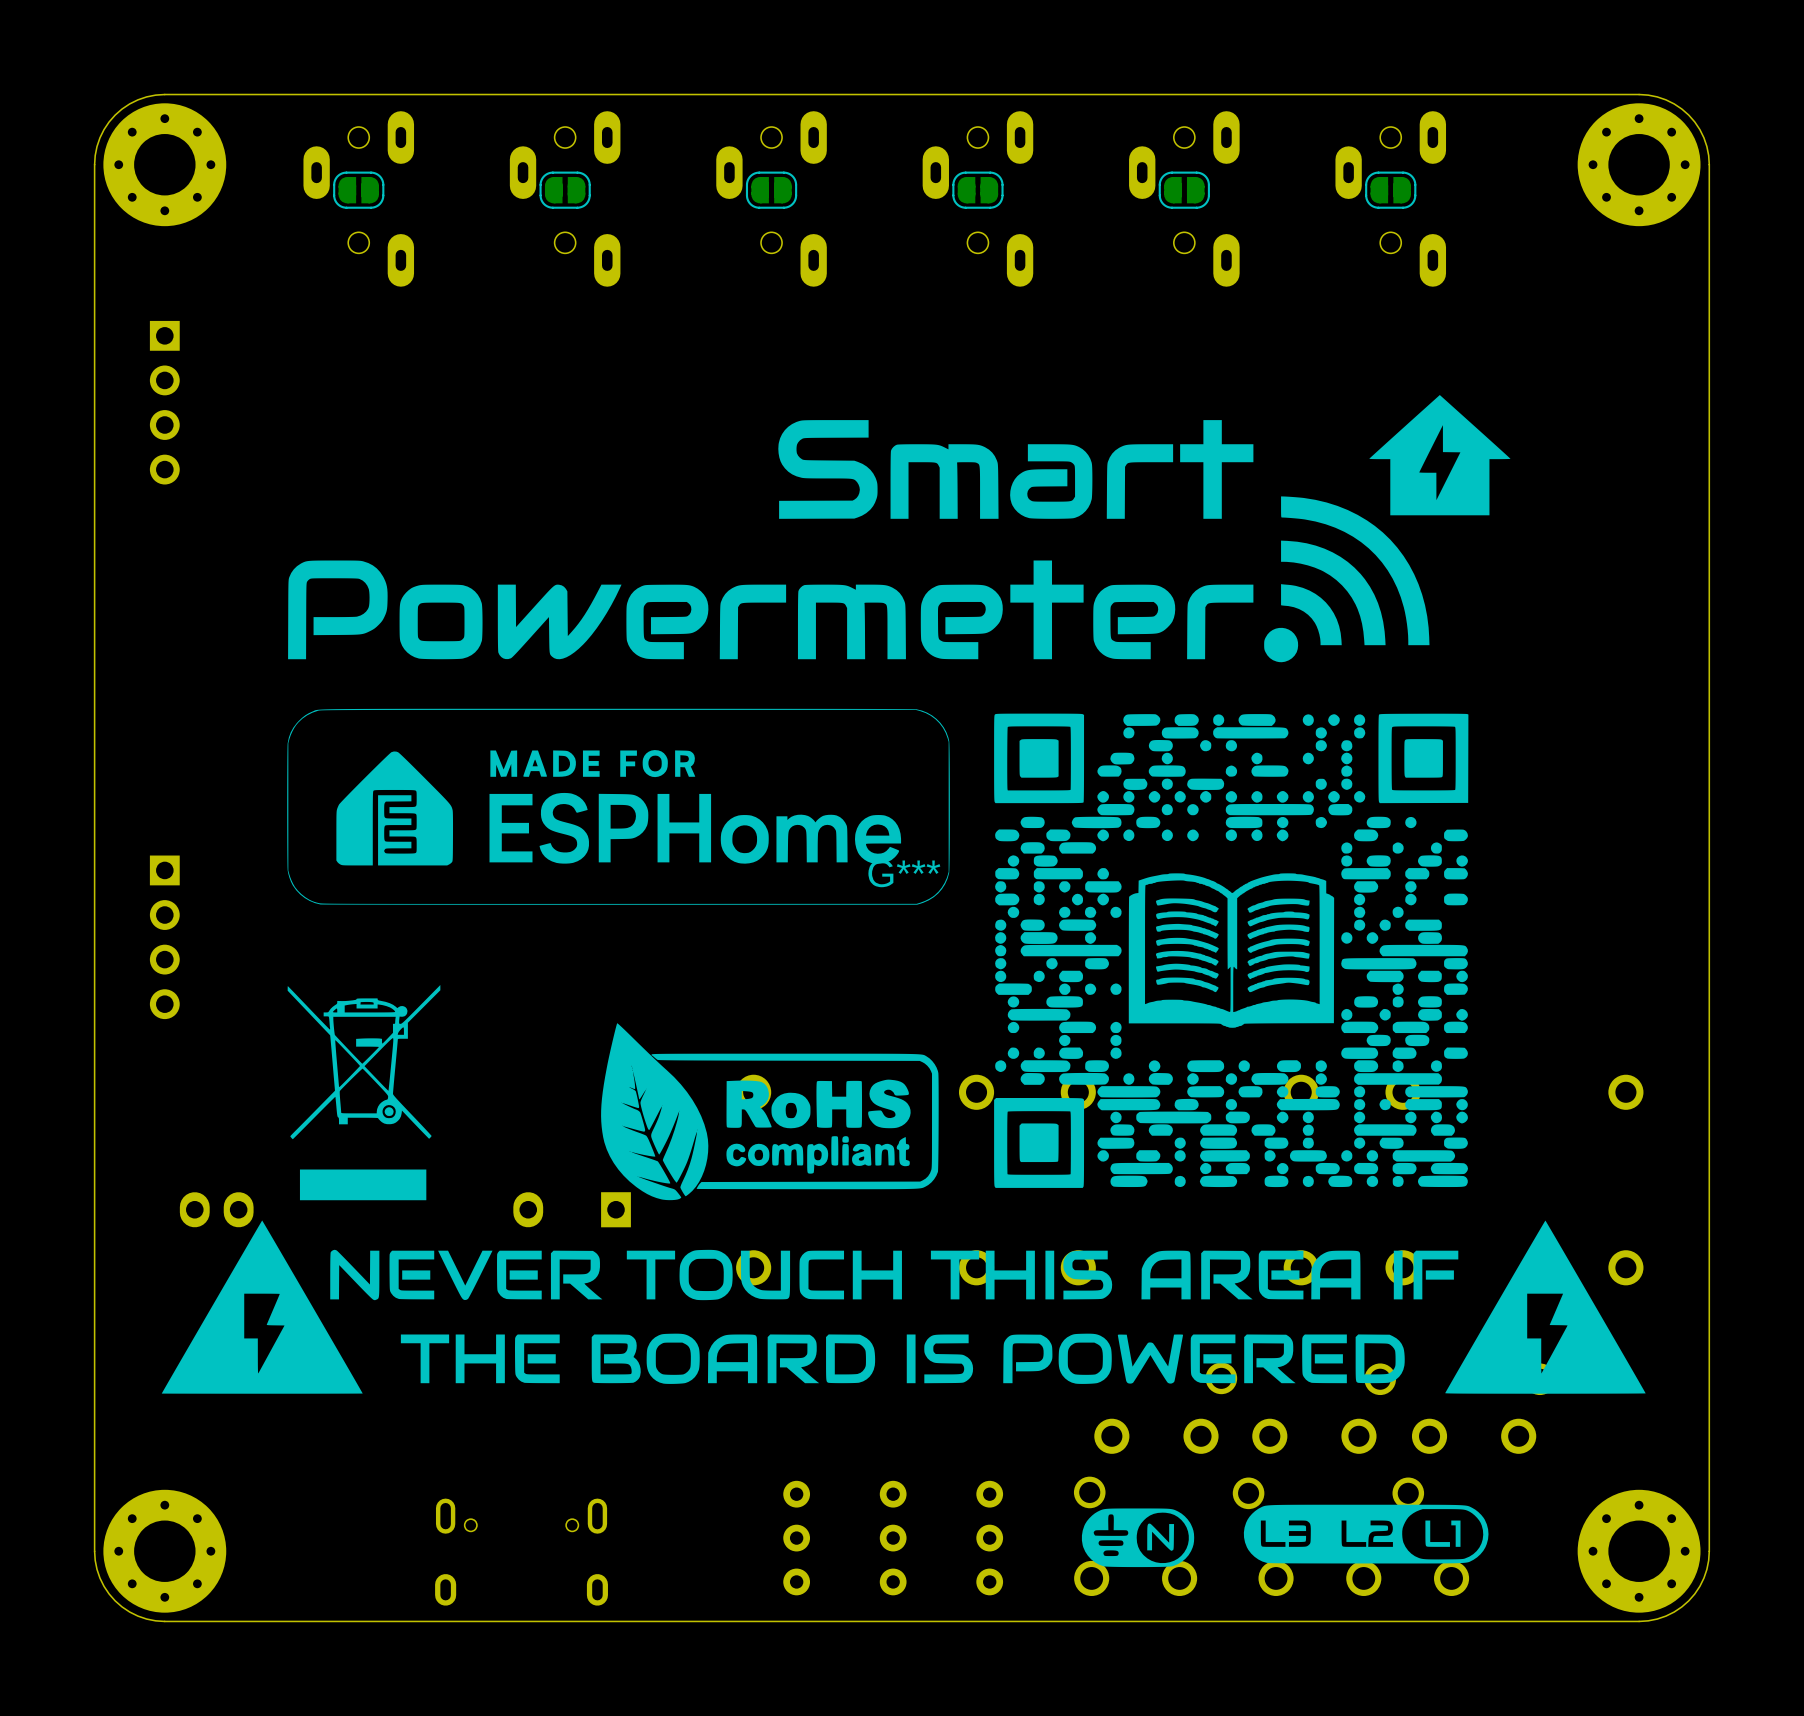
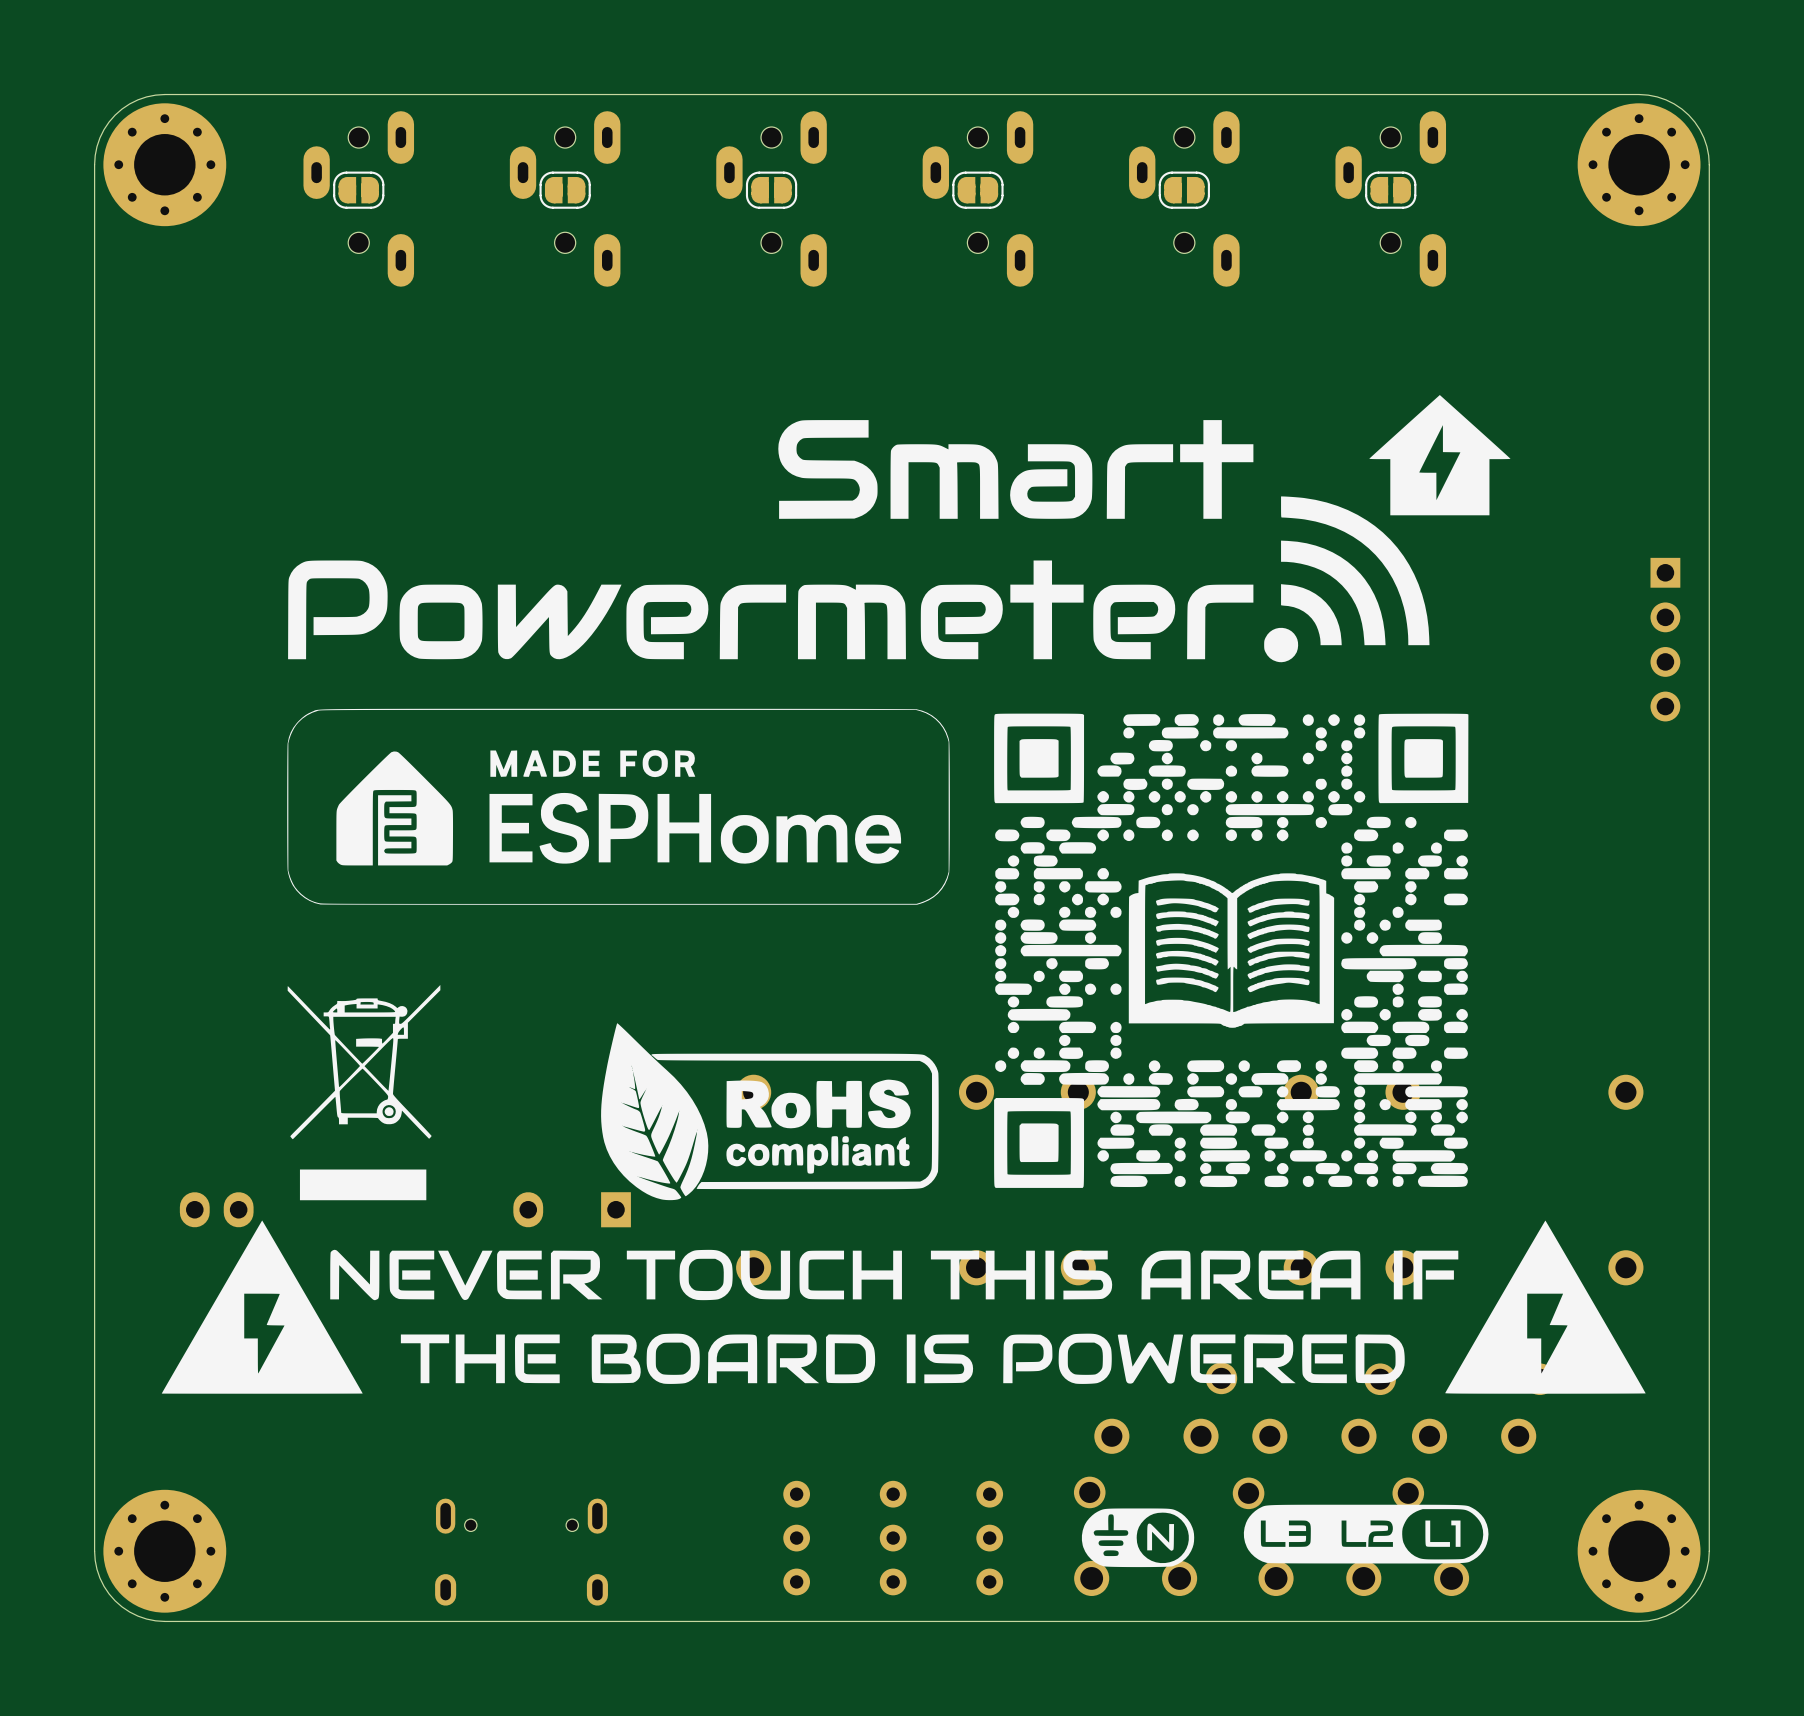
drawing: none -> [161, 395, 1646, 1568]
part: (164, 402) -> none
part: none -> (1665, 639)
part: (164, 937) -> none
G***: (903, 981) -> none

